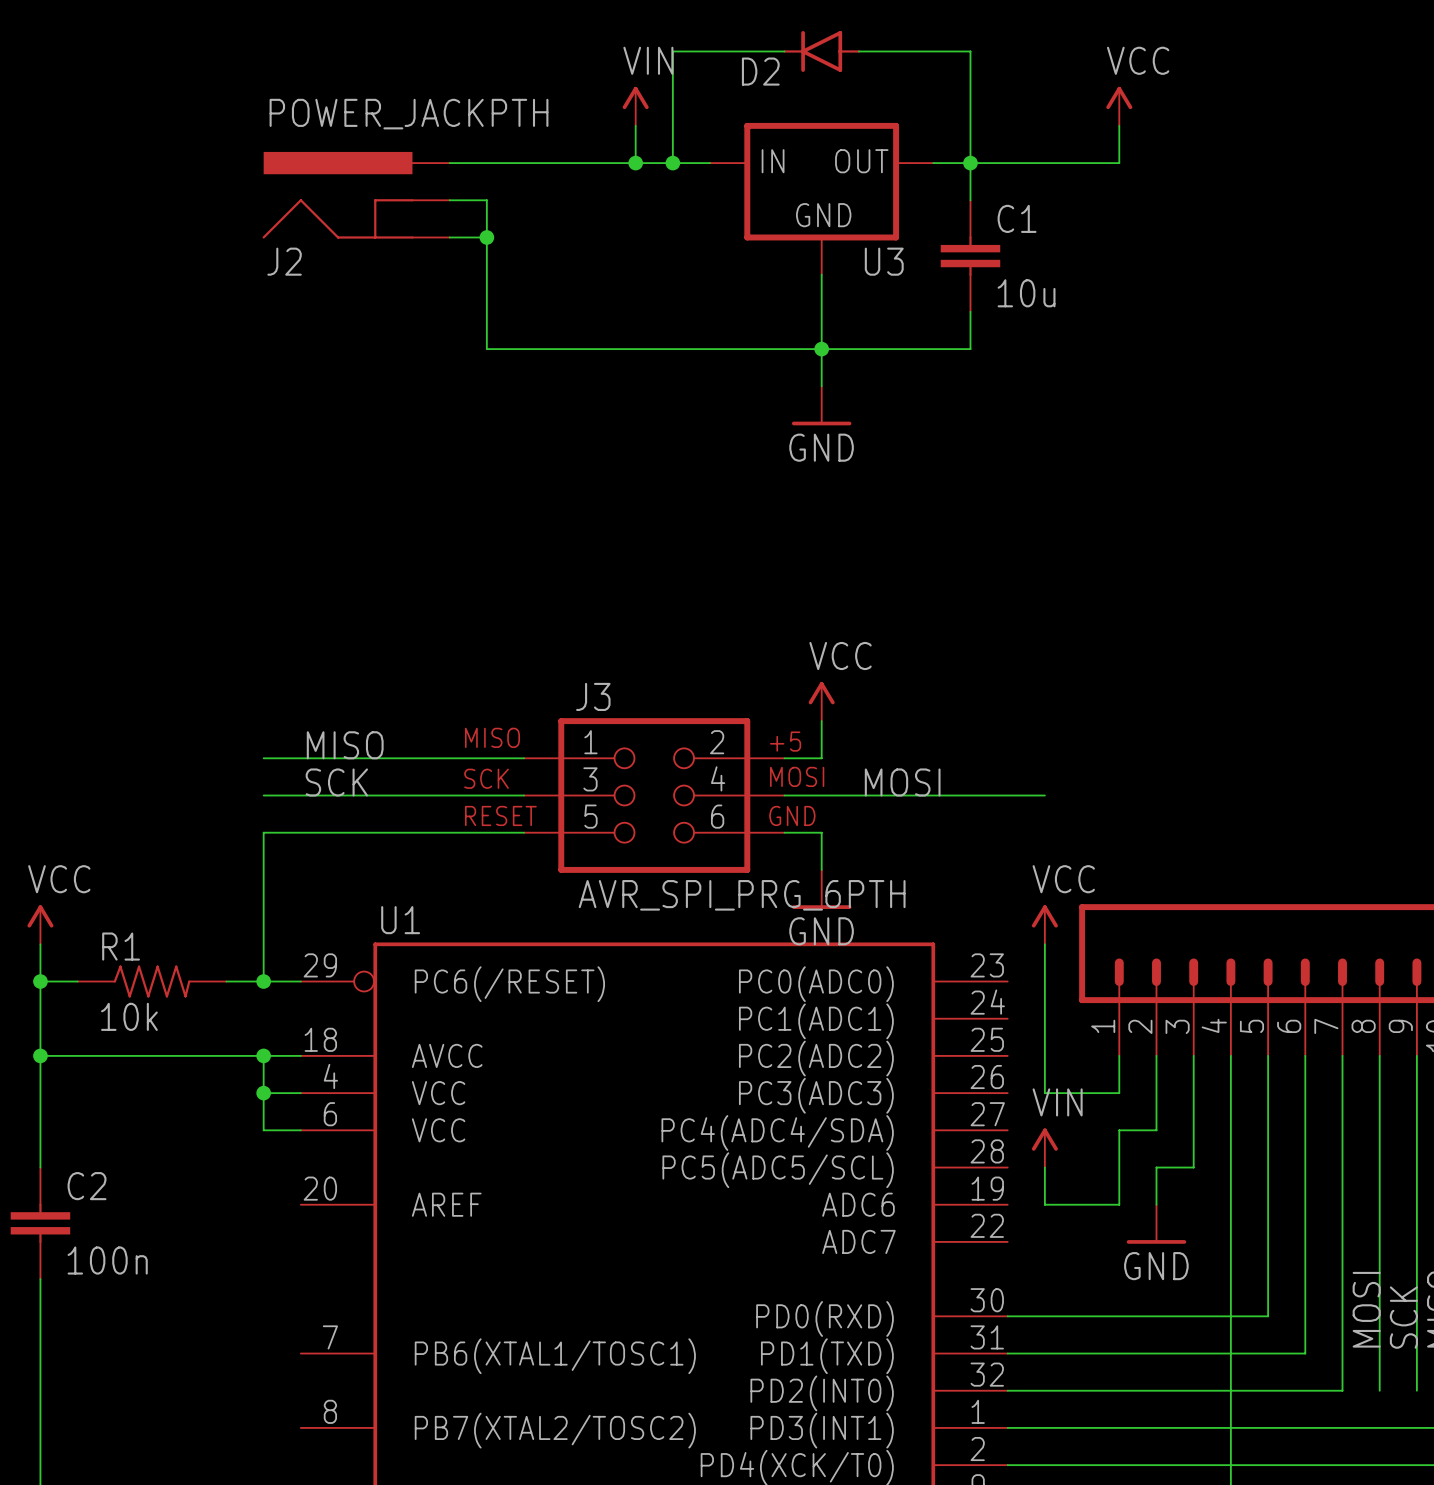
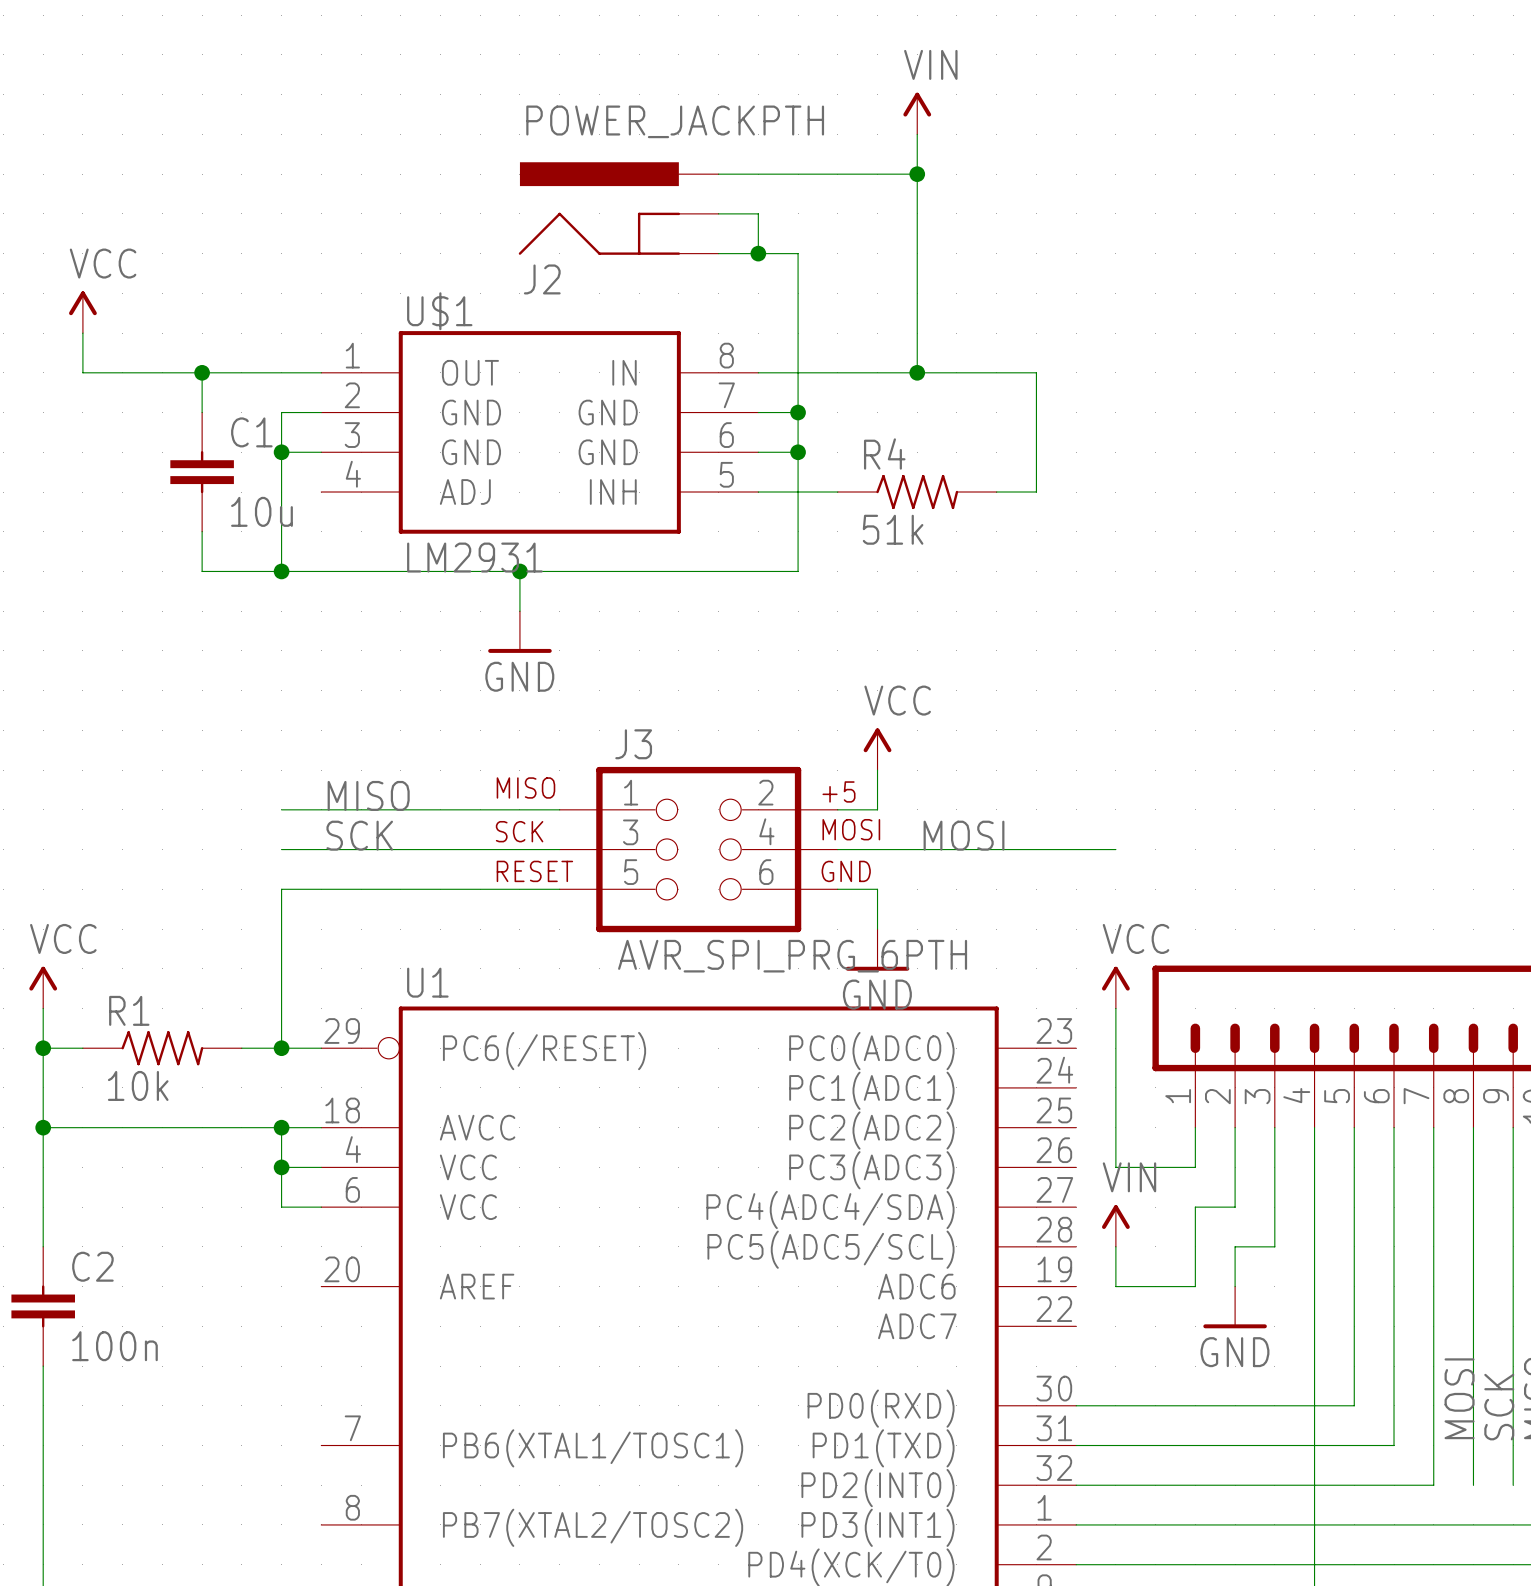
wire: (784, 51) (672, 51) (672, 163) (449, 163) -> none
D2: (821, 51) -> none
wire: (858, 51) (970, 51) (970, 200) -> none
power symbol position: VIN (635, 106) -> VIN (917, 113)
power symbol: VCC (1119, 106) -> none
wire: (635, 125) (635, 163) -> none
wire: none -> (917, 134) (917, 372)
wire: (1119, 125) (1119, 163) (933, 163) -> none
junction: (635, 163) -> none
junction: (672, 163) -> none
wire: none -> (758, 174) (917, 174)
junction: none -> (917, 174)
junction: (970, 163) -> none
J2 position: (356, 195) -> (618, 208)
U3: (821, 198) -> none
wire: (449, 200) (486, 200) (486, 349) (710, 349) -> none
wire: none -> (718, 213) (758, 213) (758, 253)
wire: (449, 237) (486, 237) -> (281, 452) (321, 452)
junction: (486, 237) -> none
wire: none -> (718, 253) (798, 253) (798, 571) (202, 571) (202, 531)
junction: none -> (758, 253)
C1 position: (970, 256) -> (202, 472)
wire: (821, 274) (821, 386) -> none
power symbol: none -> VCC (82, 312)
wire: none -> (82, 333) (82, 372) (321, 372)
wire: (970, 311) (970, 349) -> (996, 492) (1036, 492) (1036, 372)
wire: none -> (202, 372) (202, 412)
junction: none -> (202, 372)
junction position: (821, 349) -> (917, 372)
wire: none -> (321, 412) (281, 412) (281, 571)
wire: none -> (758, 412) (798, 412)
junction: none -> (798, 412)
U$1: none -> LM2931 (539, 432)
power symbol: GND (821, 405) -> none
junction: none -> (281, 452)
wire: none -> (758, 452) (798, 452)
junction: none -> (798, 452)
wire: none -> (758, 492) (837, 492)
R4: none -> 51k (917, 492)
junction: none -> (281, 571)
wire: none -> (519, 571) (519, 611)
junction: none -> (519, 571)
power symbol: none -> GND (519, 632)

